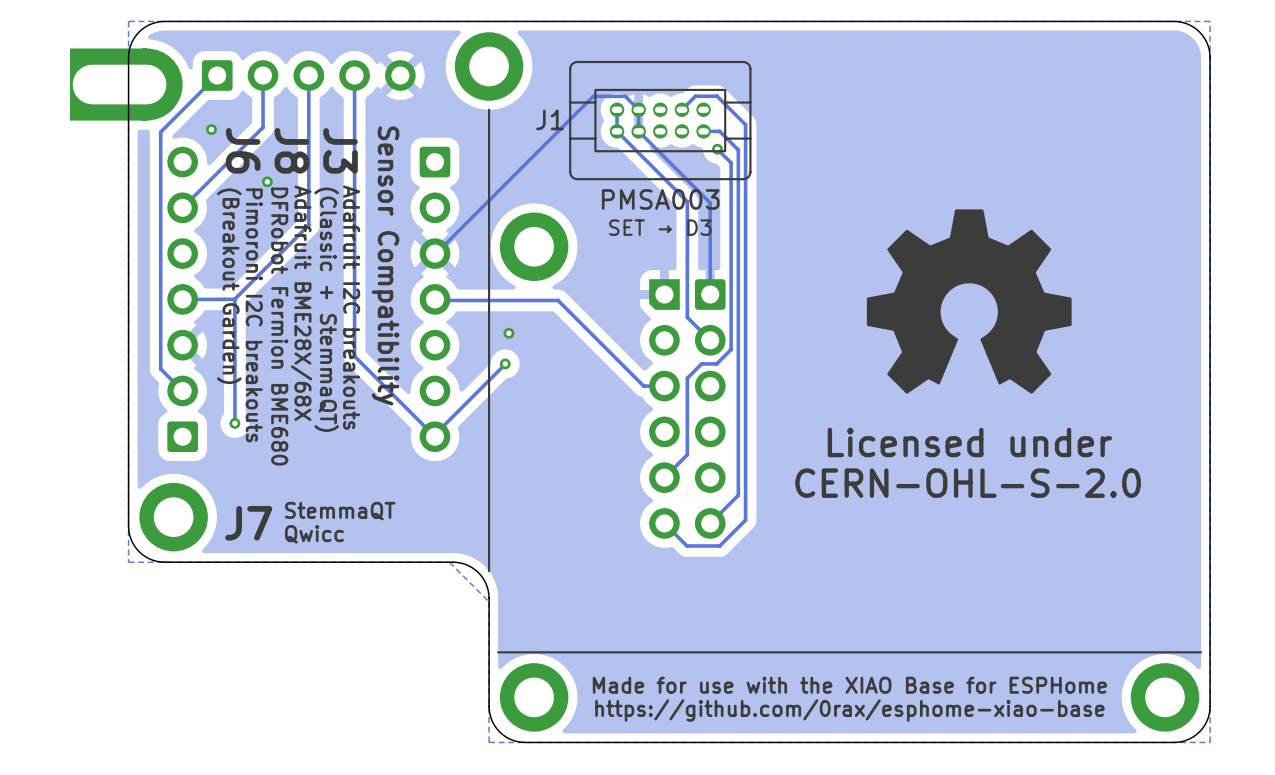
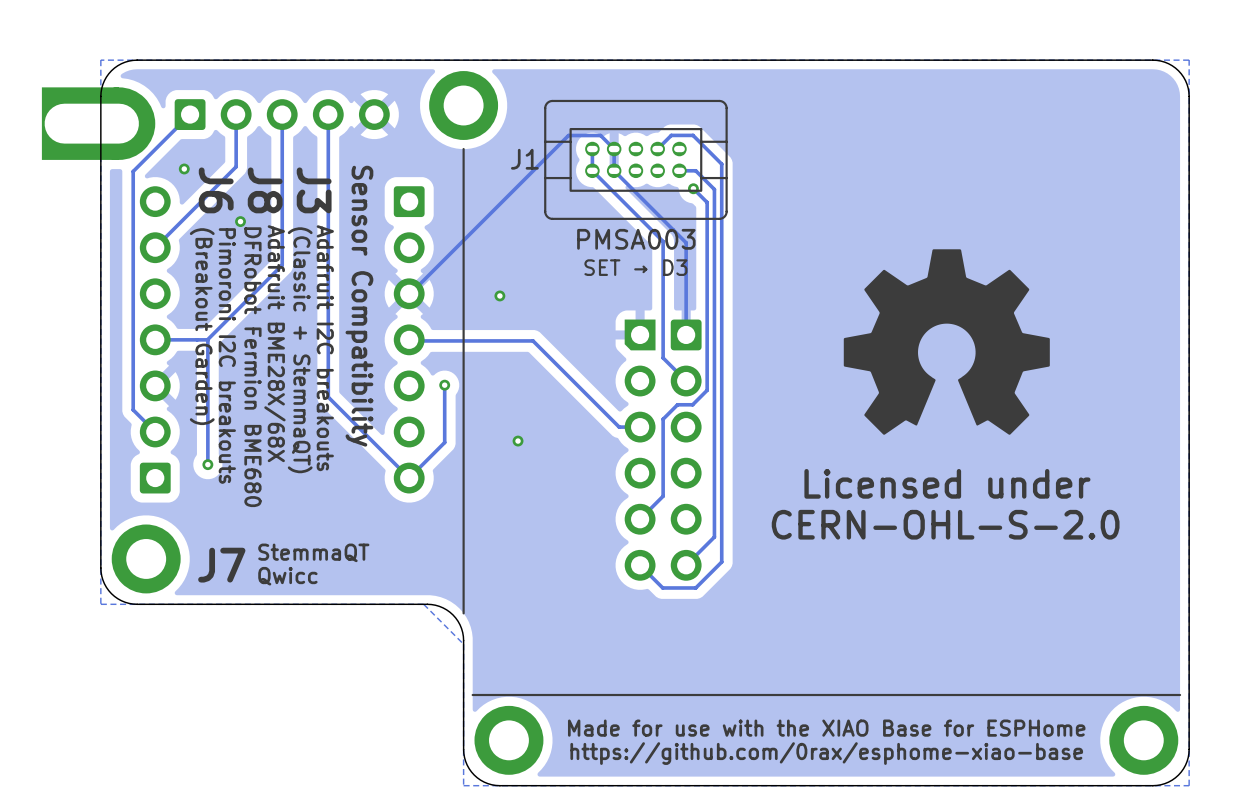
part: (534, 246) -> none
via: none -> (499, 295)
via: (508, 333) -> none
via: none -> (444, 385)
via: (505, 363) -> none
track: (505, 364) (434, 434) (434, 436) -> (444, 385) (444, 442) (409, 478)
via: none -> (518, 441)

